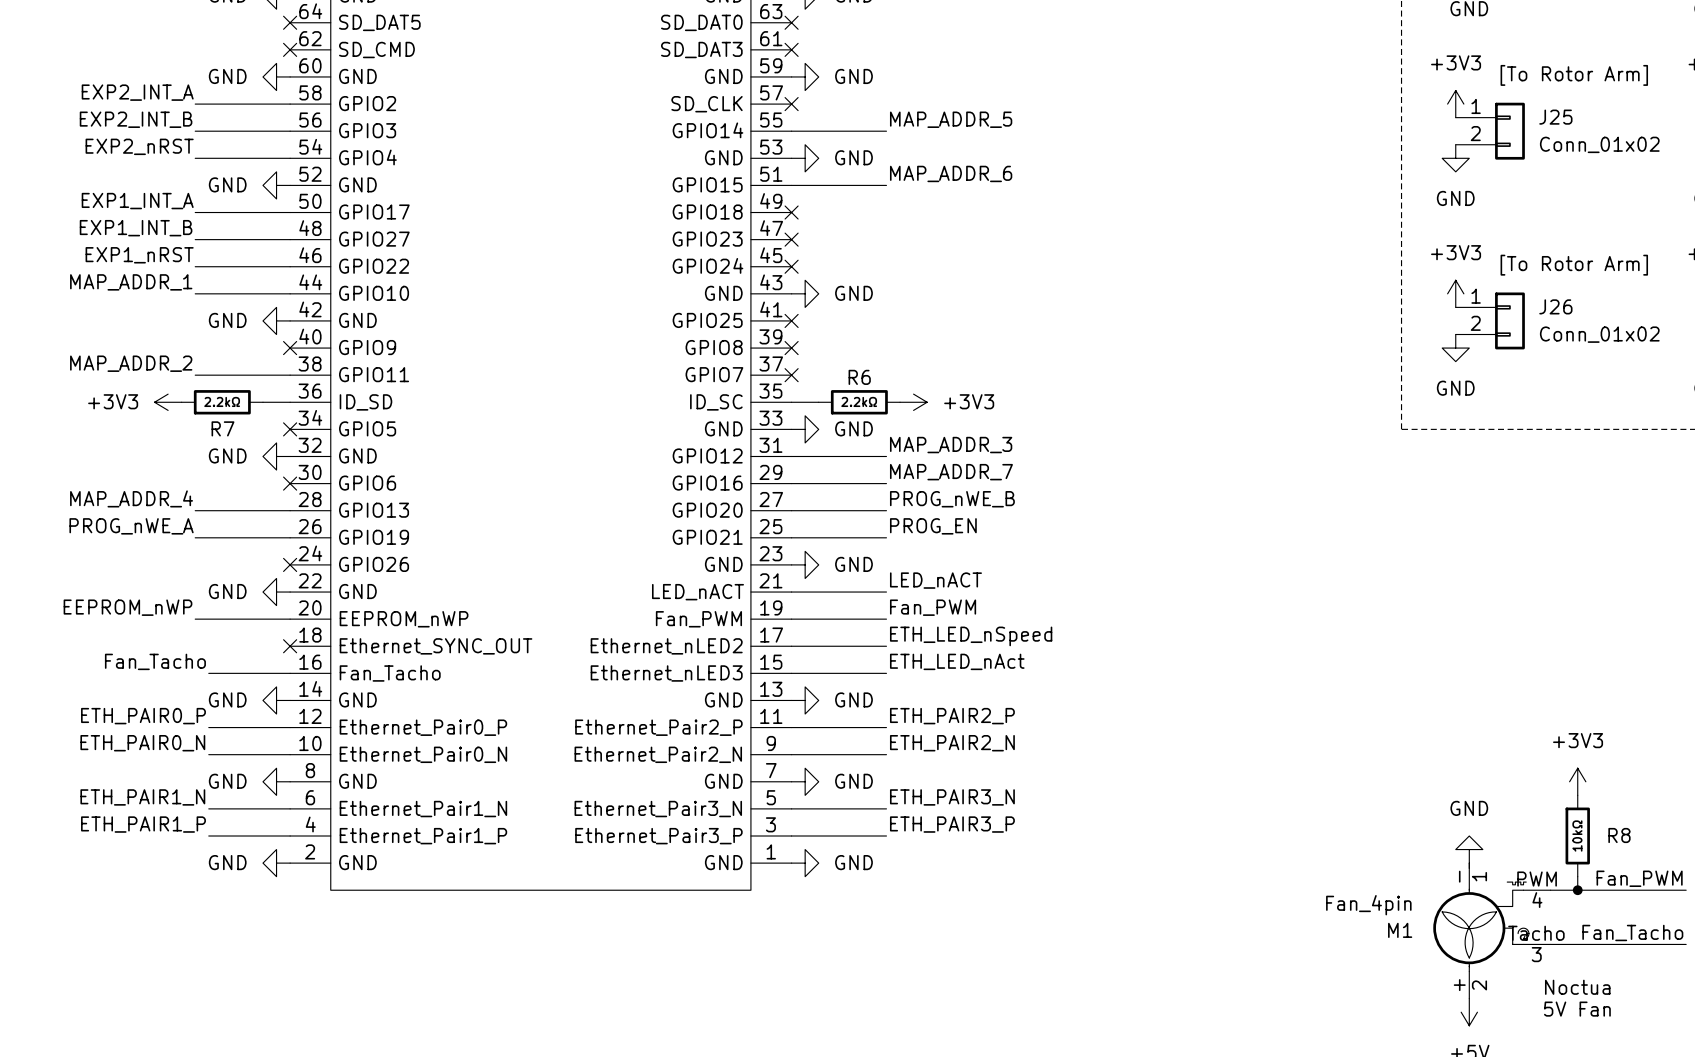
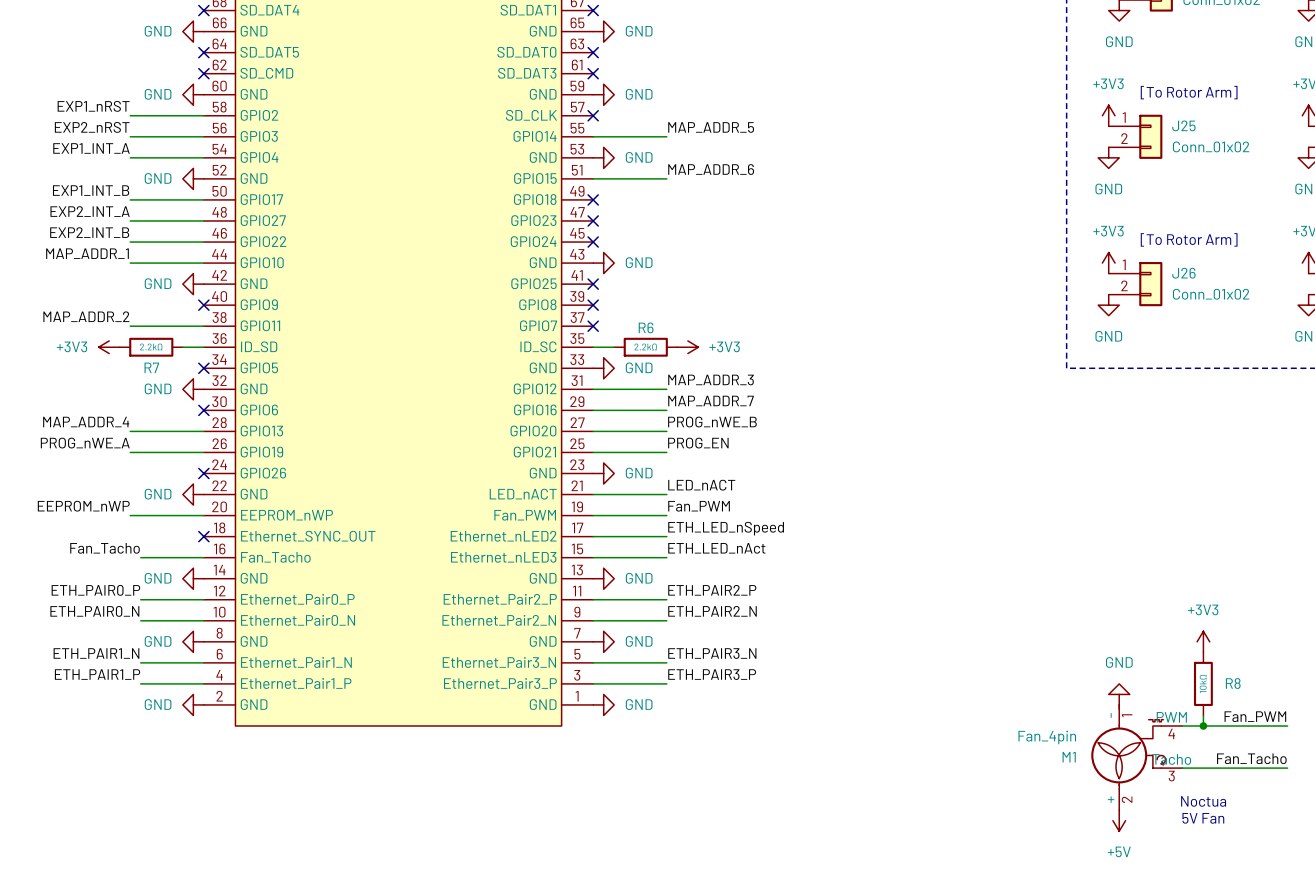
label: EXP2_INT_A (137, 92) -> EXP1_nRST (93, 106)
label: EXP2_INT_B (136, 119) -> EXP2_nRST (92, 127)
label: EXP2_nRST (139, 146) -> EXP1_INT_A (91, 148)
label: EXP1_INT_A (137, 201) -> EXP1_INT_B (91, 190)
label: EXP1_INT_B (136, 228) -> EXP2_INT_A (90, 211)
label: EXP1_nRST (139, 255) -> EXP2_INT_B (89, 232)

